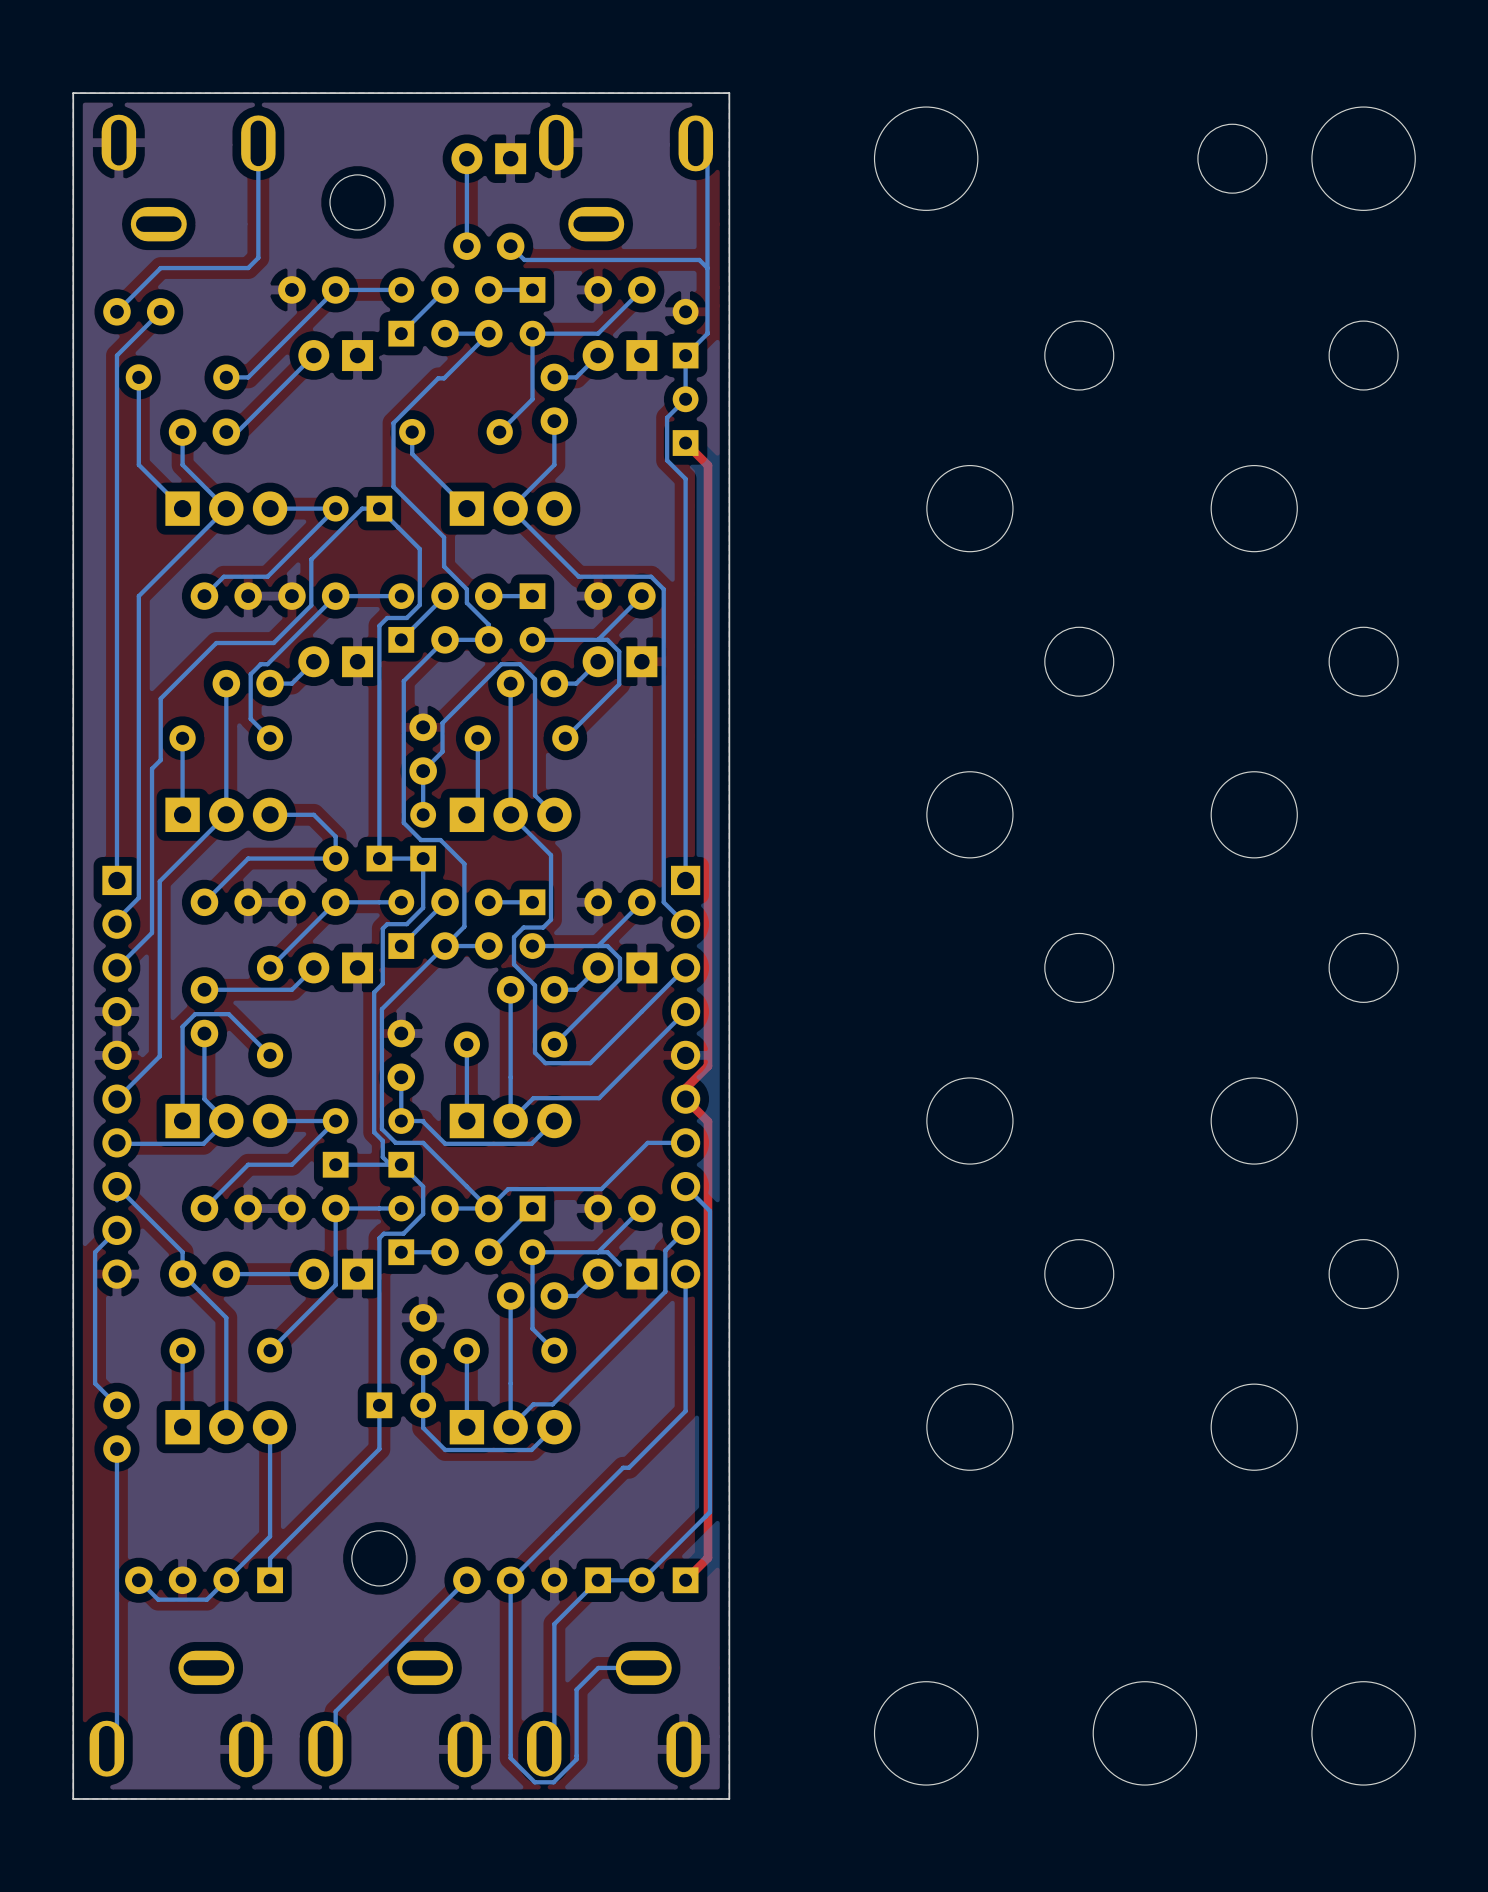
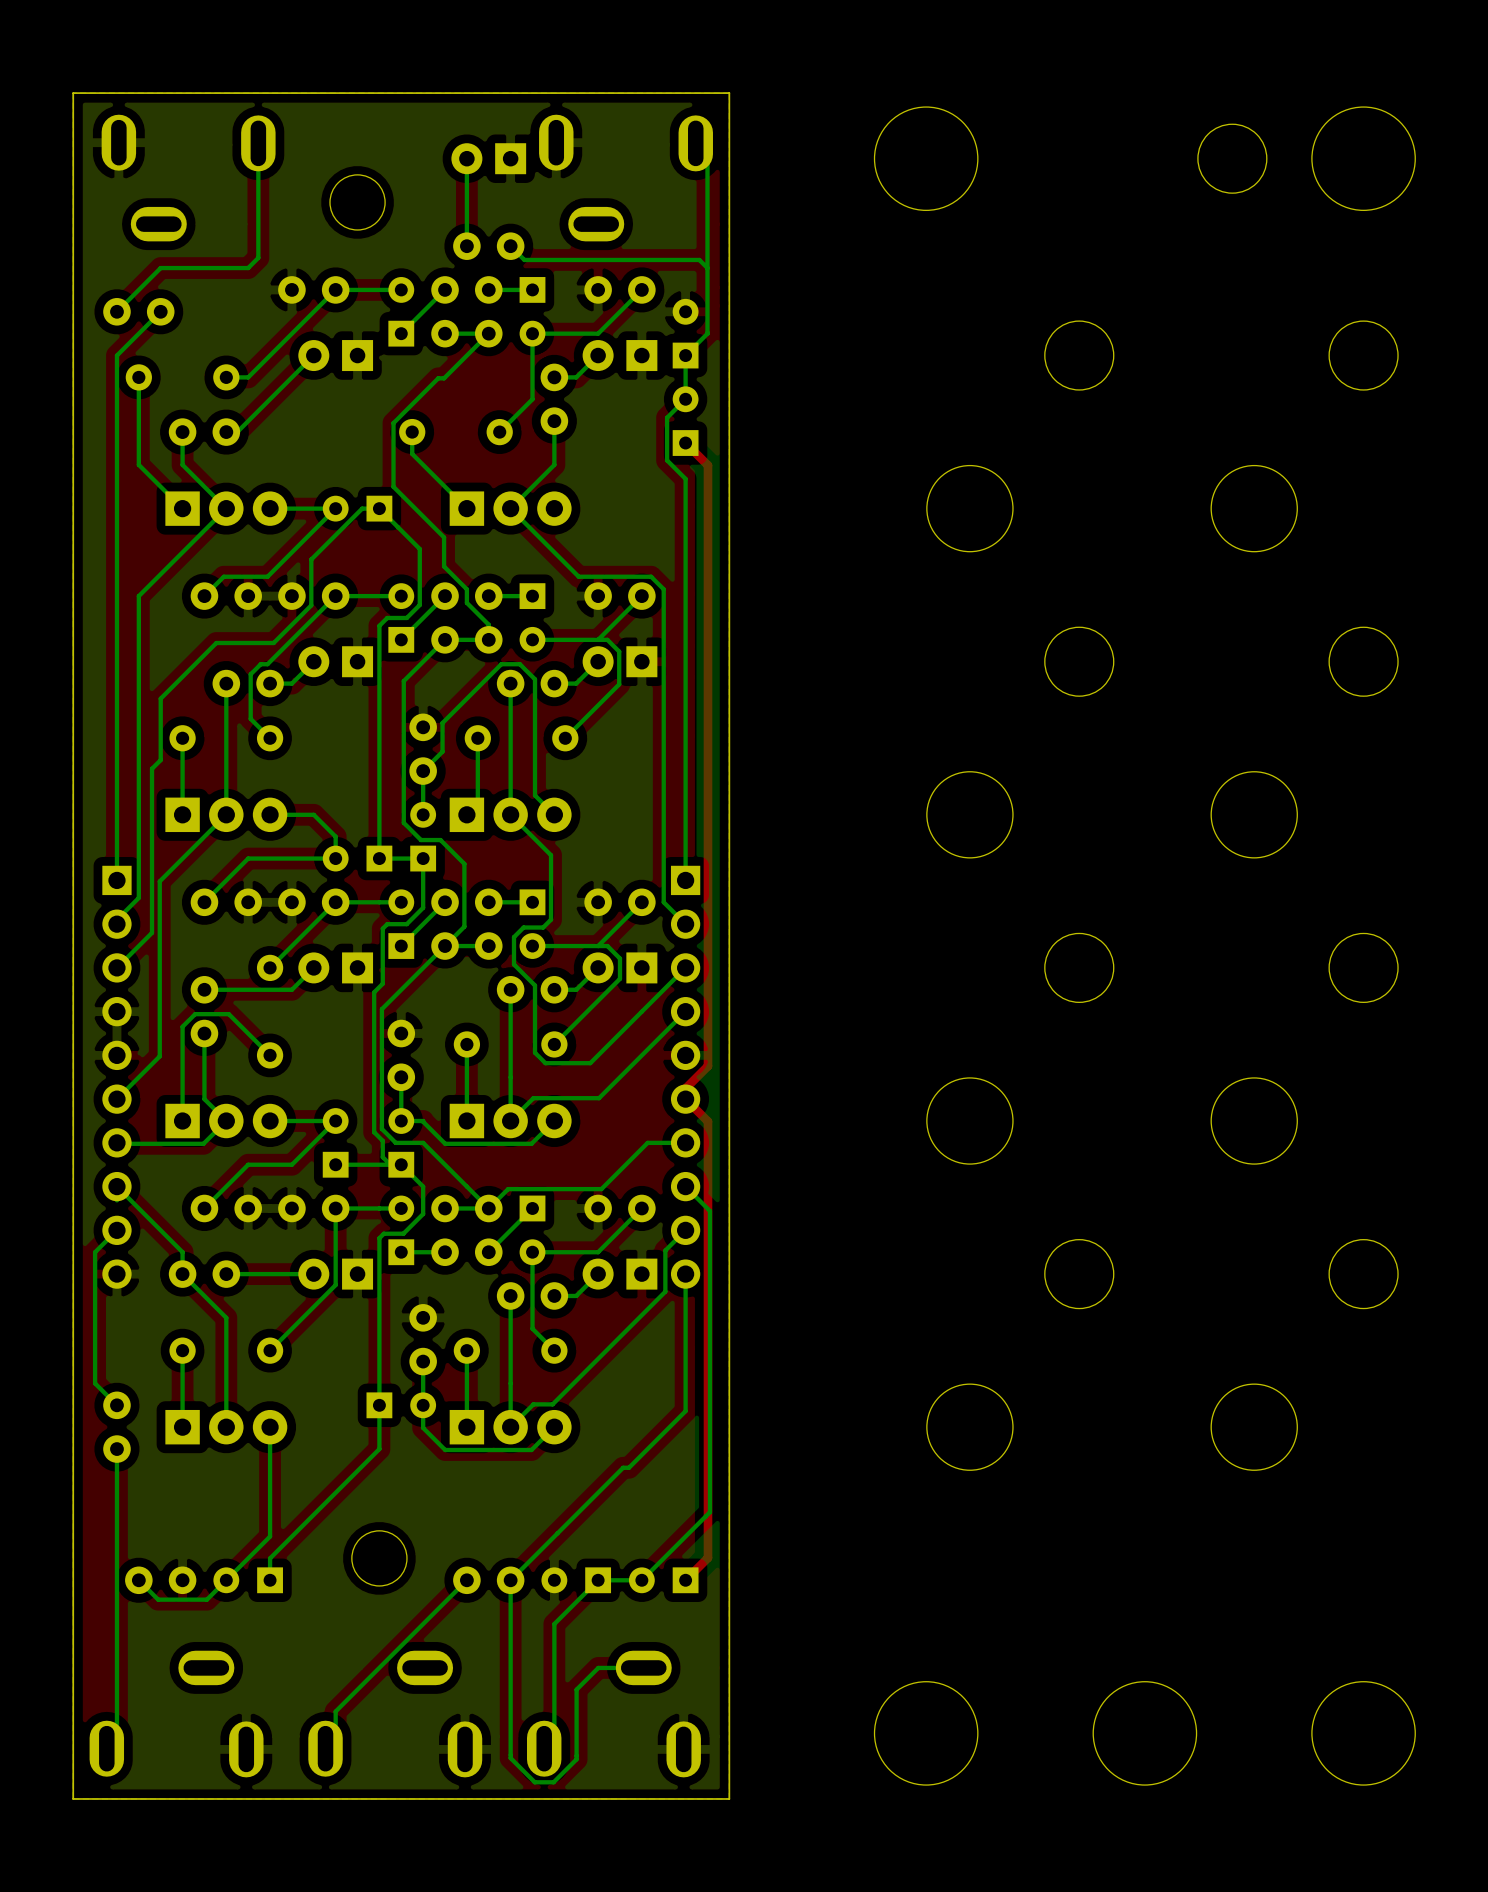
bottom track: (598, 1252) (607, 1252) (619, 1264) -> none

